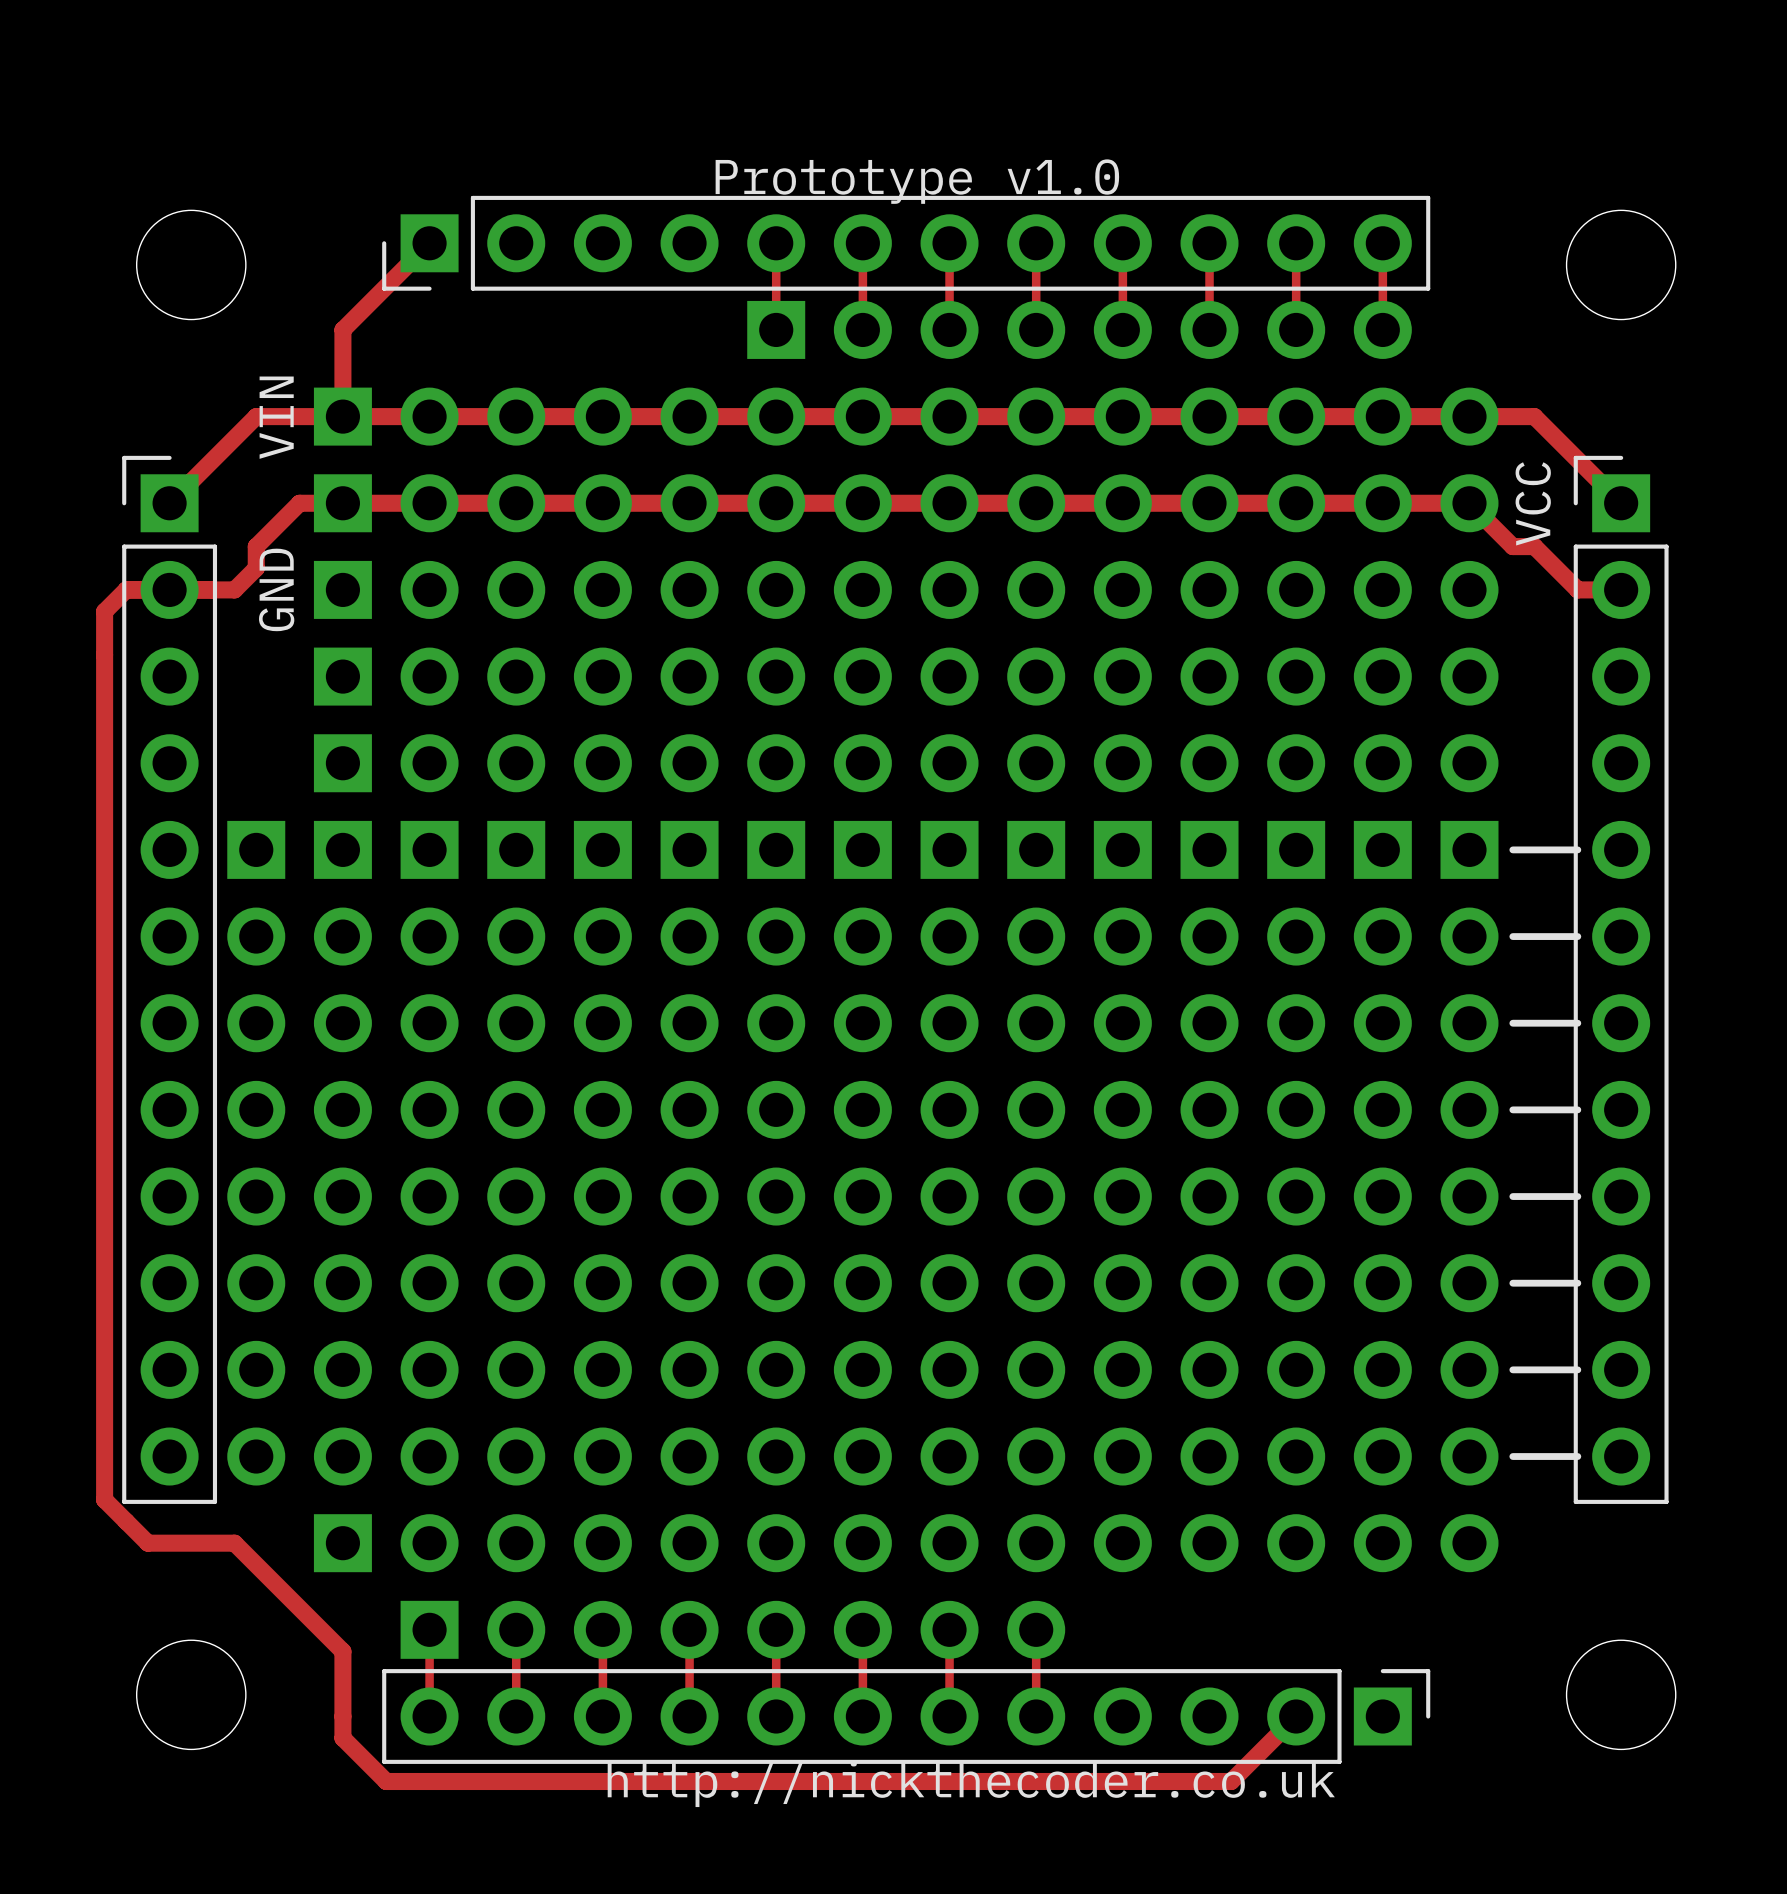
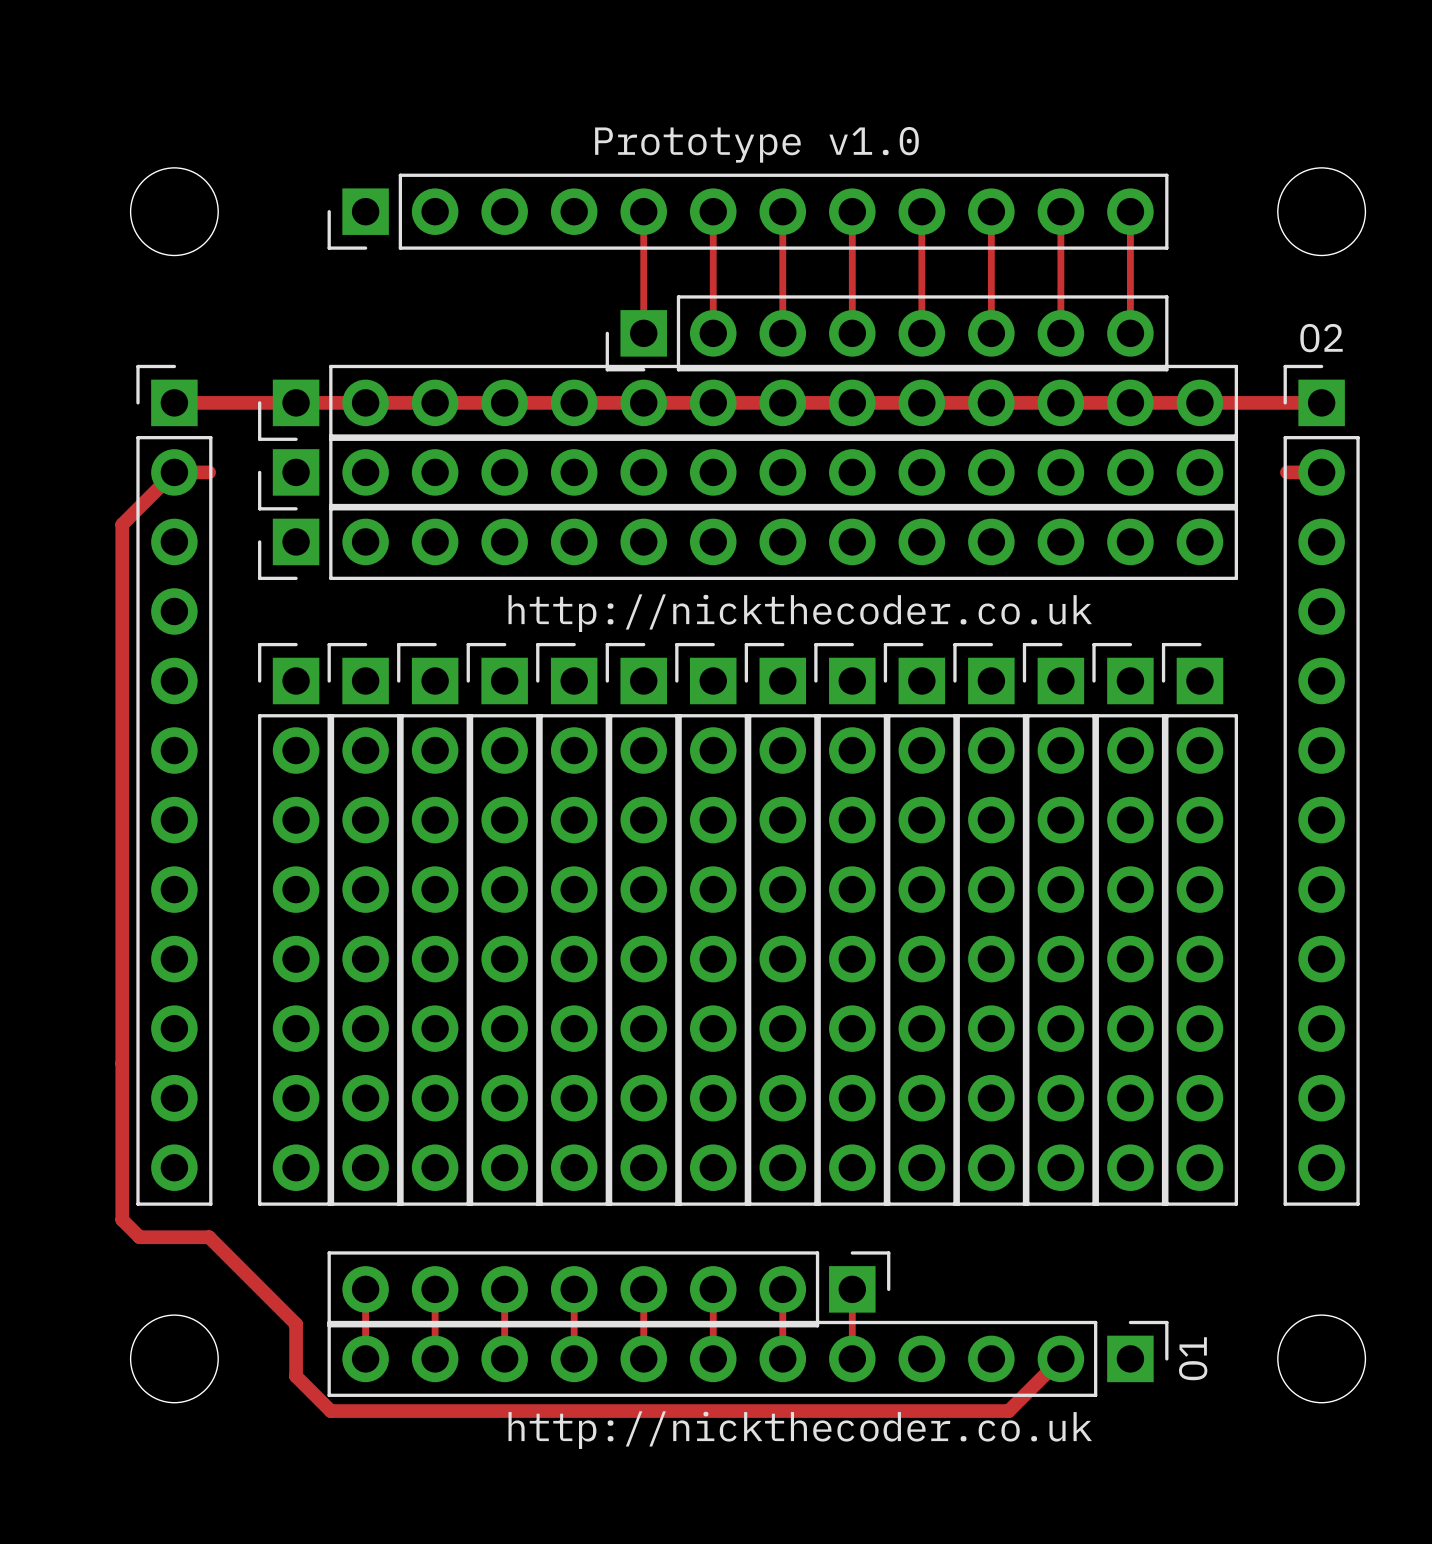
track: (429, 243) (342, 329) (342, 416) -> none
part position: (906, 243) -> (748, 211)
track: none -> (643, 263) (643, 333)
track: none -> (713, 263) (713, 333)
track: none -> (782, 263) (782, 333)
track: none -> (852, 263) (852, 333)
part: (1079, 329) -> none
track: none -> (921, 263) (921, 333)
track: none -> (991, 263) (991, 333)
track: none -> (1060, 263) (1060, 333)
track: none -> (1130, 263) (1130, 333)
part: (906, 416) -> none
part: none -> (887, 333)
text: VIN (276, 417) -> none
O2 name: none -> O2 (1321, 338)
track: (169, 503) (256, 416) (1534, 416) (1621, 503) -> none
track: (299, 503) (256, 546) (256, 568) (234, 589) -> (261, 402) (174, 402)
part side: bottom (906, 503) -> top (748, 402)
track: (1469, 503) (1512, 546) (1534, 546) (1577, 589) -> (1199, 402) (1321, 402)
text: VCC (1533, 503) -> none
track: (191, 589) (126, 589) (104, 611) (104, 1499) (126, 1521) -> (174, 472) (122, 524) (122, 1219)
text: GND (276, 589) -> none
part side: bottom (906, 589) -> top (748, 472)
part side: bottom (906, 676) -> top (748, 541)
part: (906, 763) -> none
text: none -> http://nickthecoder.co.uk (800, 613)
line: (1512, 849) (1577, 849) -> none
line: (1512, 936) (1577, 936) -> none
part position: (169, 979) -> (174, 785)
line: (1512, 1023) (1577, 1023) -> none
line: (1512, 1109) (1577, 1109) -> none
part: (256, 1153) -> none
part side: bottom (342, 1153) -> top (296, 924)
part side: bottom (429, 1153) -> top (365, 924)
part side: bottom (516, 1153) -> top (435, 924)
part side: bottom (602, 1153) -> top (504, 924)
part side: bottom (689, 1153) -> top (574, 924)
part side: bottom (776, 1153) -> top (643, 924)
part side: bottom (862, 1153) -> top (713, 924)
part side: bottom (949, 1153) -> top (782, 924)
part side: bottom (1036, 1153) -> top (852, 924)
part side: bottom (1122, 1153) -> top (921, 924)
part side: bottom (1209, 1153) -> top (991, 924)
part side: bottom (1296, 1153) -> top (1060, 924)
part side: bottom (1382, 1153) -> top (1130, 924)
part side: bottom (1469, 1153) -> top (1199, 924)
line: (1512, 1196) (1577, 1196) -> none
line: (1512, 1283) (1577, 1283) -> none
line: (1512, 1369) (1577, 1369) -> none
line: (1512, 1456) (1577, 1456) -> none
part: (906, 1543) -> none
part side: bottom (732, 1629) -> top (608, 1289)
O1 name: none -> O1 (1193, 1358)
track: (342, 1716) (342, 1738) (386, 1781) (1231, 1781) (1296, 1716) -> (296, 1376) (330, 1411) (1008, 1411) (1060, 1358)
O1 position: (906, 1716) -> (748, 1358)

